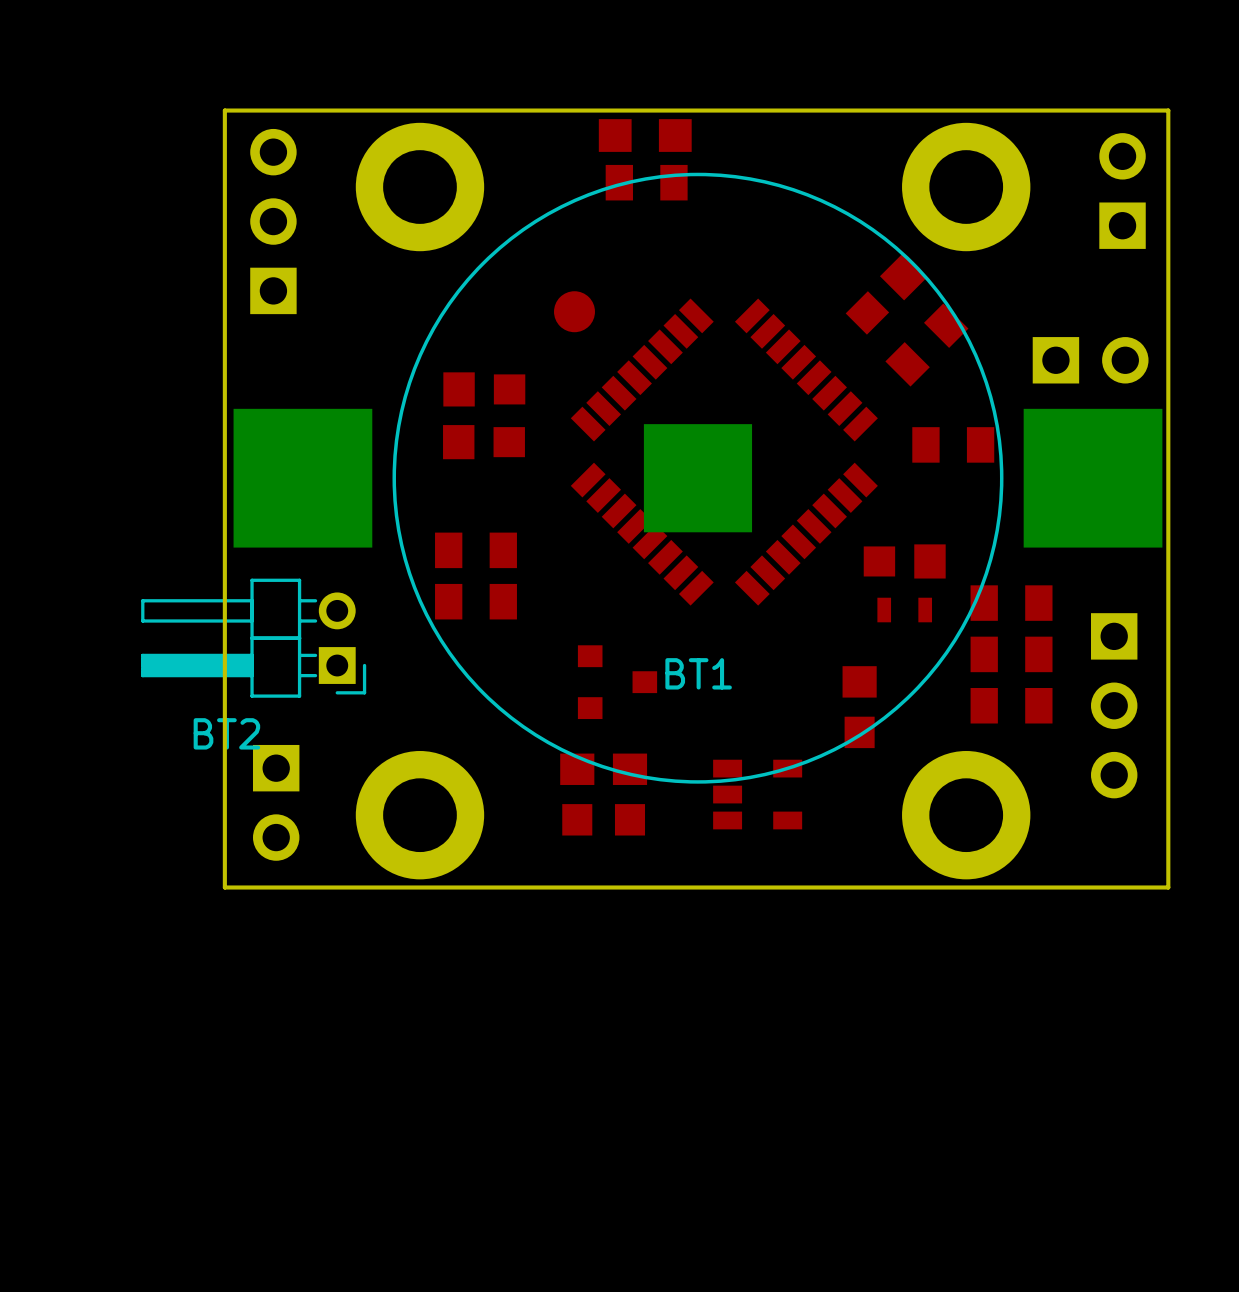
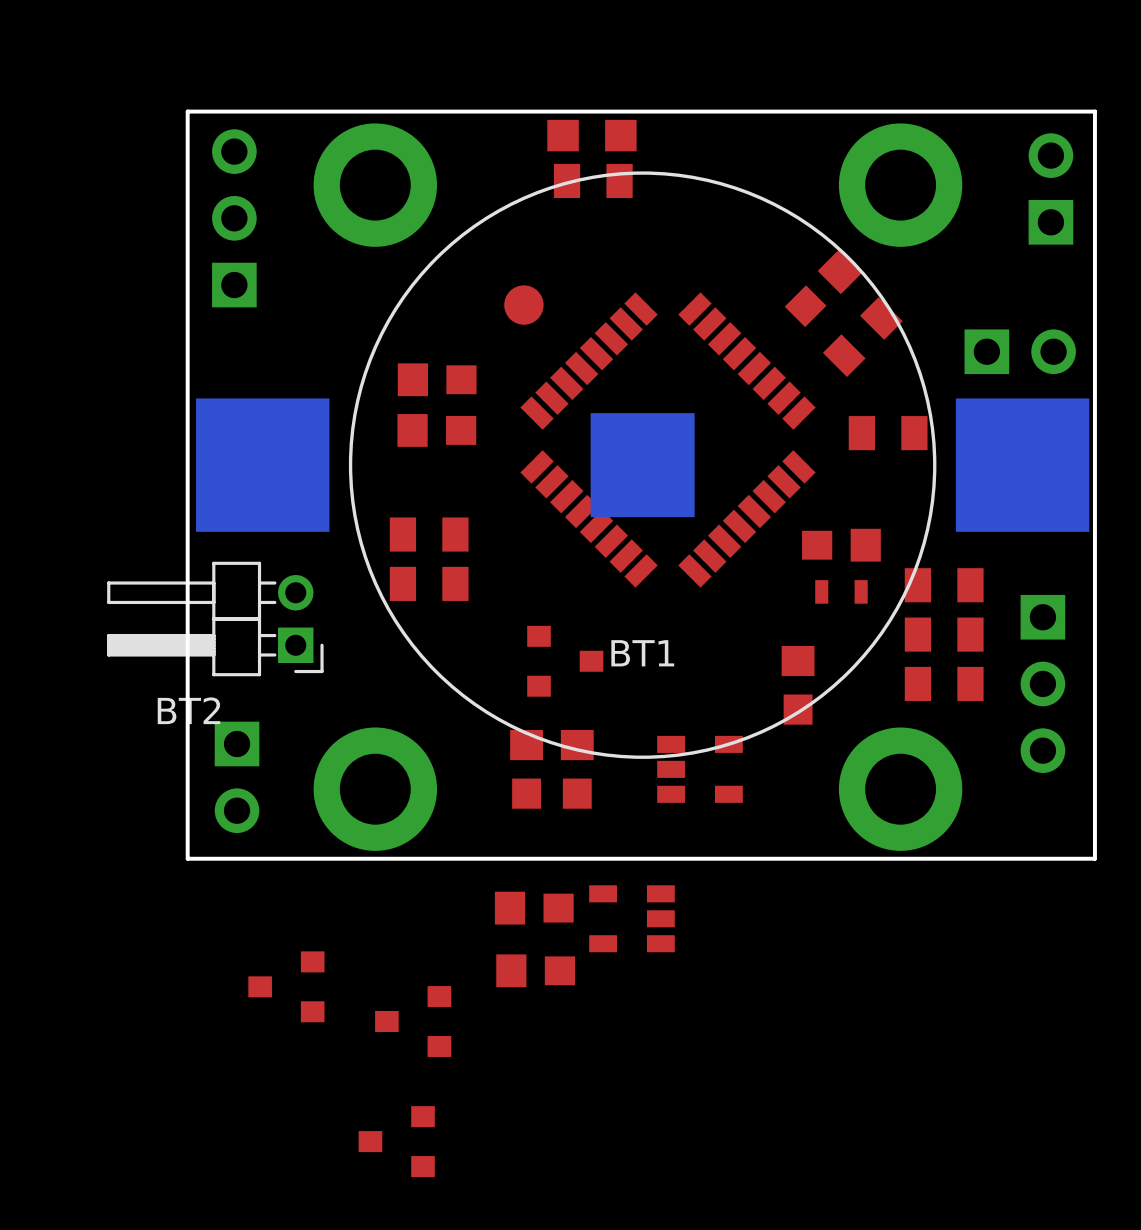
part: none -> (534, 908)
part: none -> (631, 918)
part: none -> (535, 970)
part: none -> (286, 986)
part: none -> (413, 1021)
part: none -> (396, 1141)

